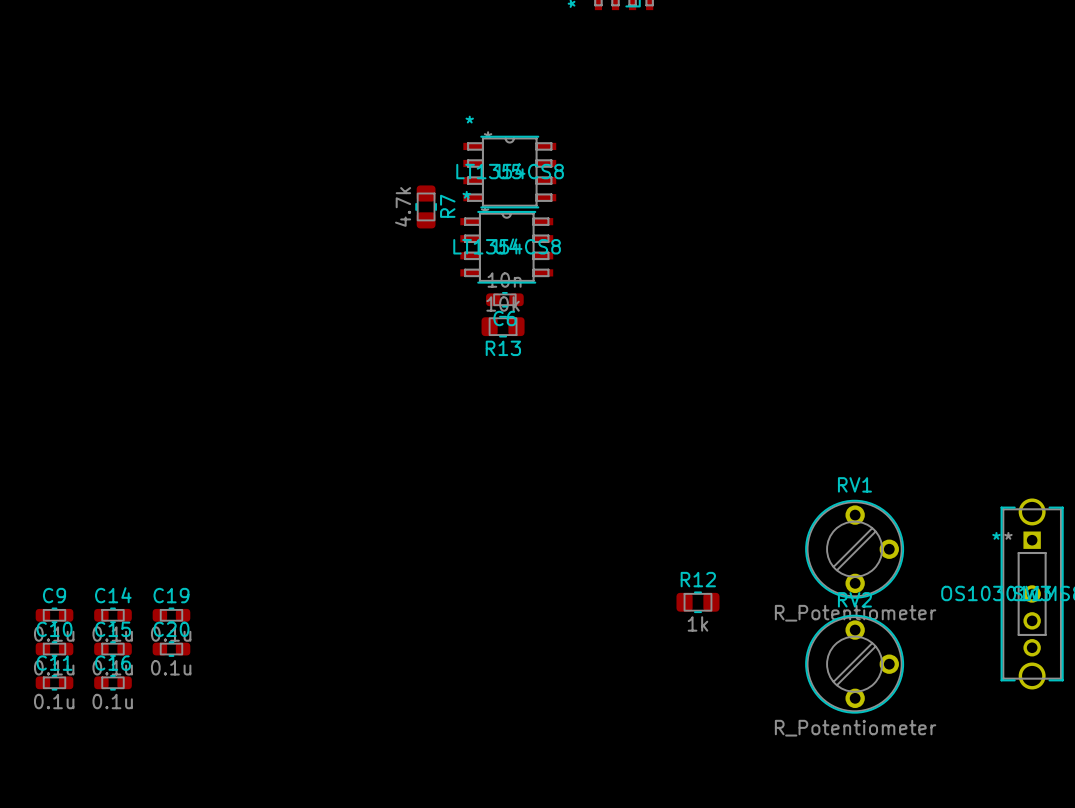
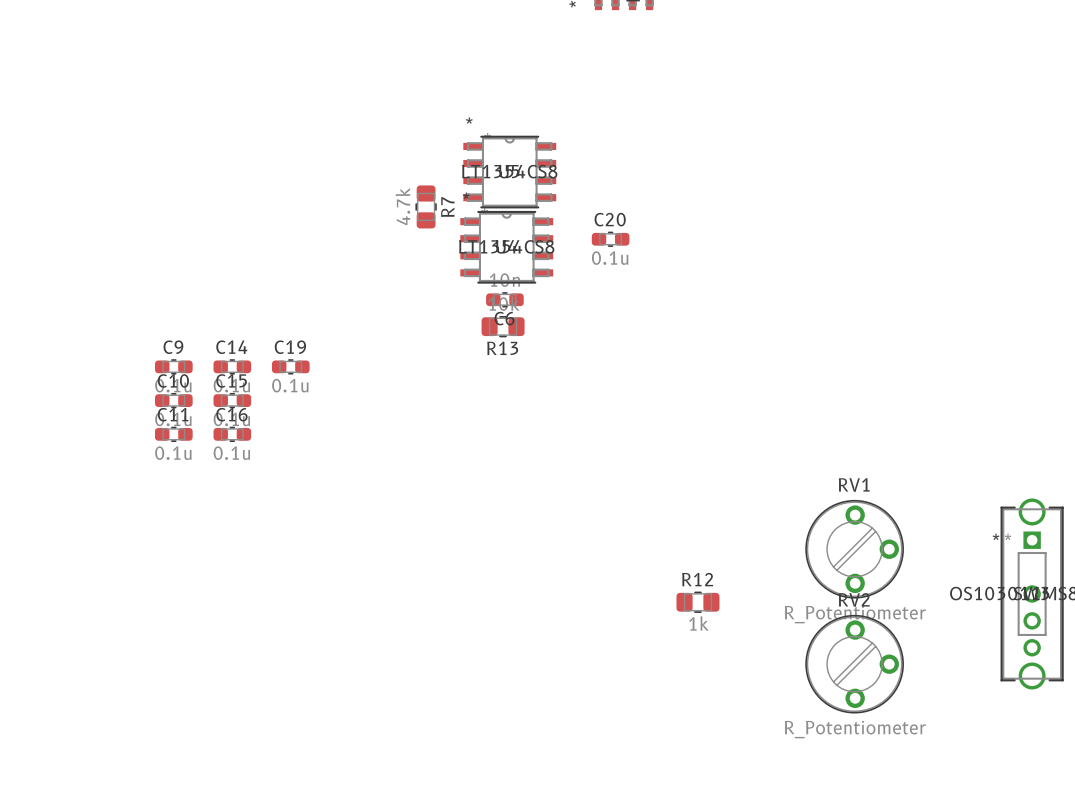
C9 position: (54, 615) -> (173, 366)
C14 position: (113, 615) -> (232, 366)
C19 position: (171, 615) -> (290, 366)
C10 position: (54, 649) -> (173, 400)
C15 position: (113, 649) -> (232, 400)
C20 position: (171, 649) -> (610, 239)
C11 position: (54, 682) -> (173, 434)
C16 position: (113, 682) -> (232, 434)

